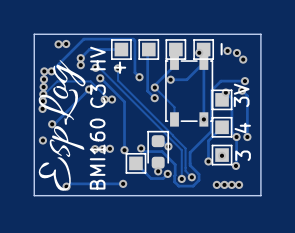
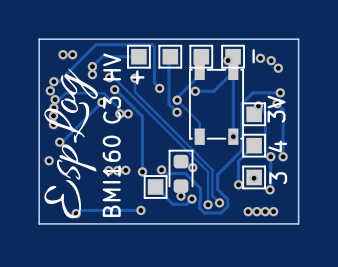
via: (66, 43) -> none
via: (58, 44) -> none
via: none -> (63, 54)
via: none -> (72, 54)
via: (44, 71) -> none
via: none -> (53, 81)
via: (51, 71) -> none
via: (43, 87) -> none
via: none -> (55, 99)
via: (43, 94) -> none
via: none -> (53, 107)
via: (42, 101) -> none
via: none -> (53, 115)
via: (42, 108) -> none
via: none -> (53, 124)

